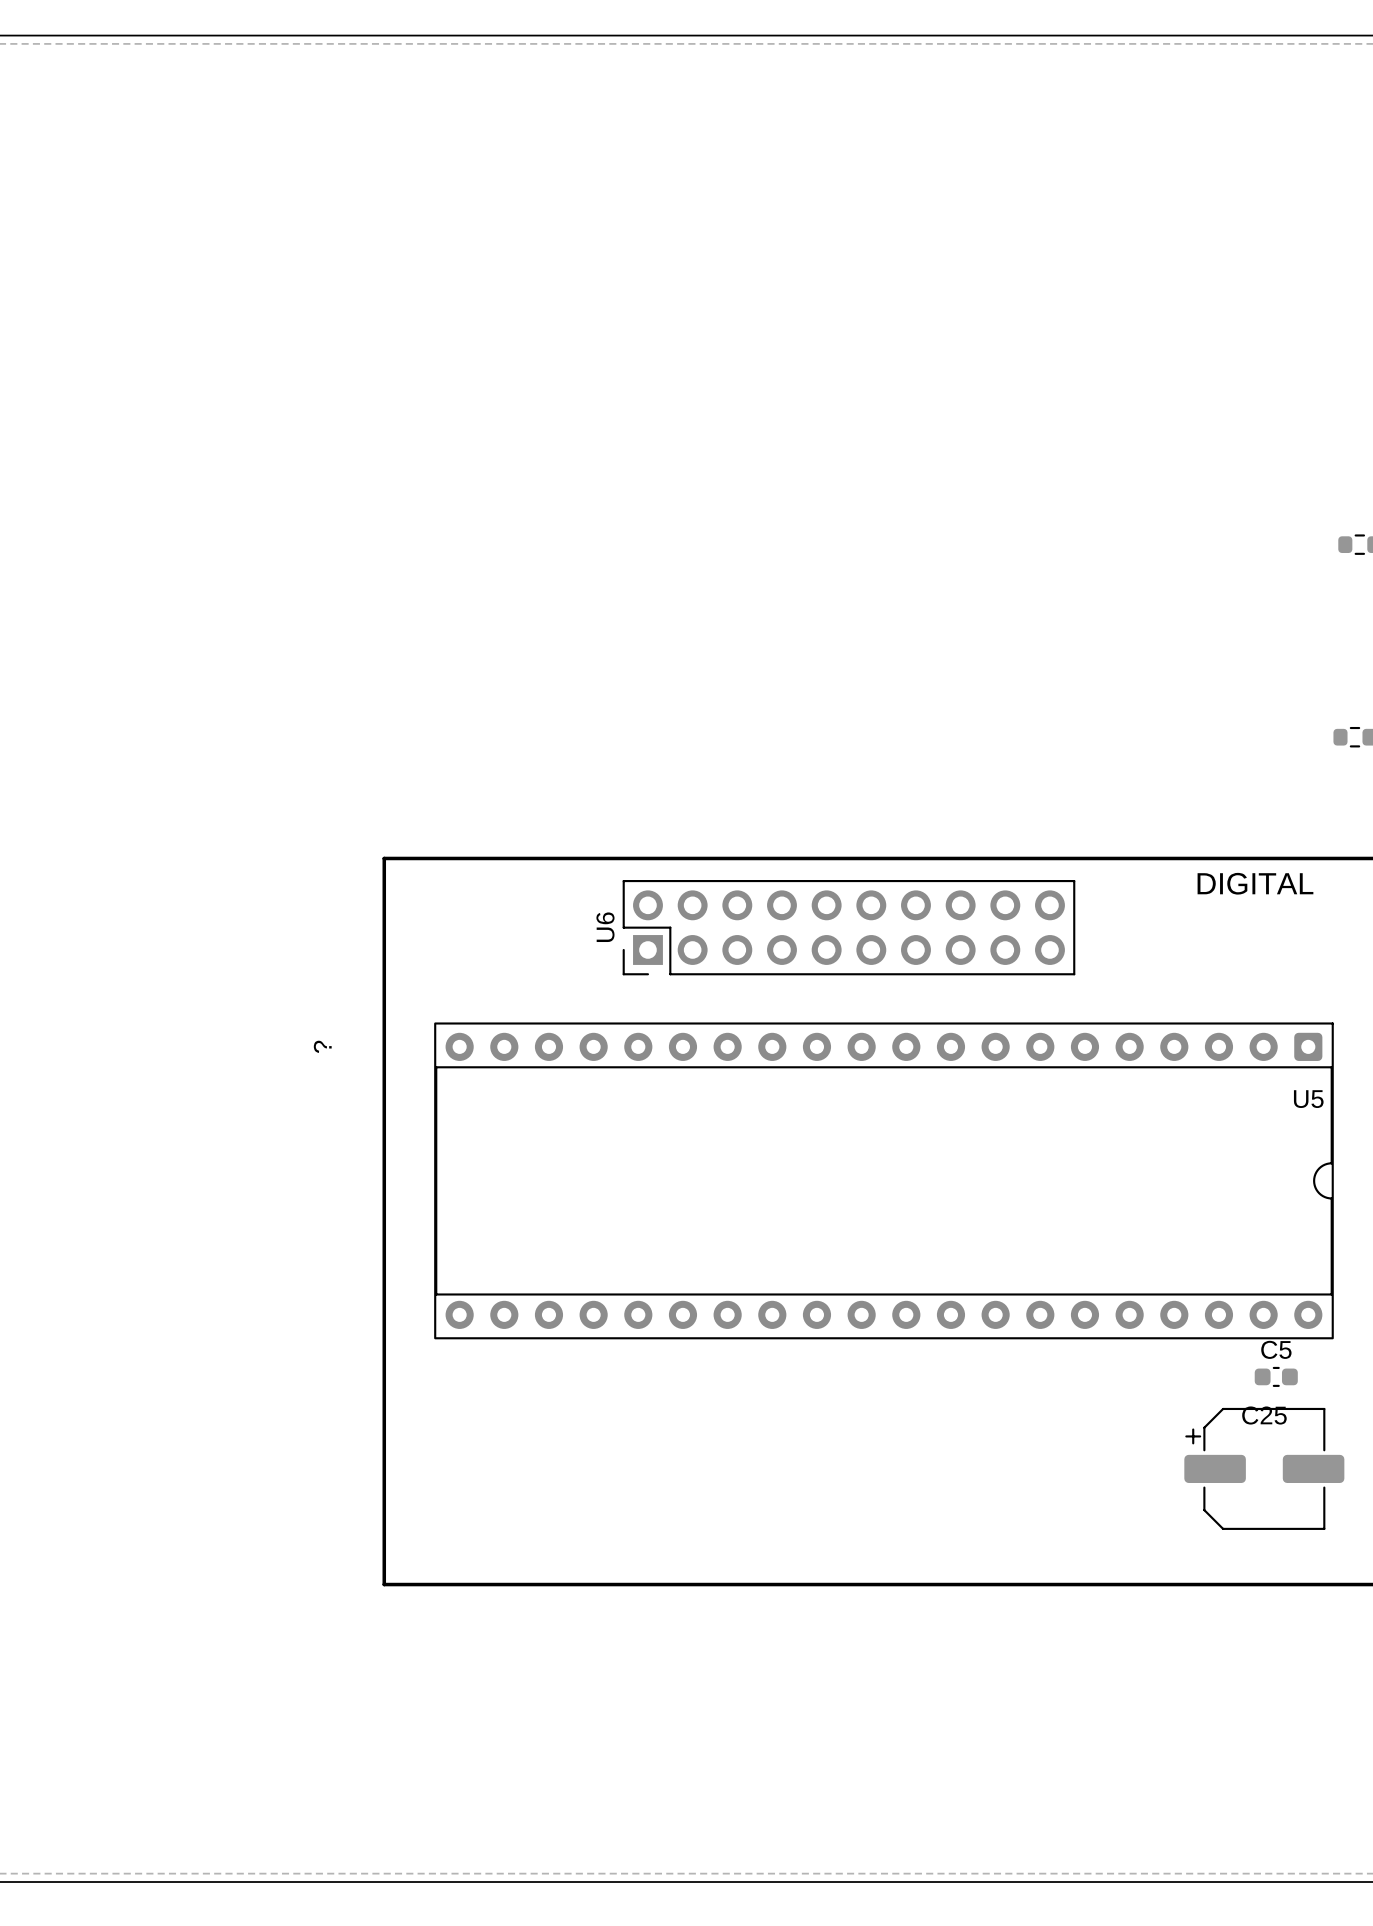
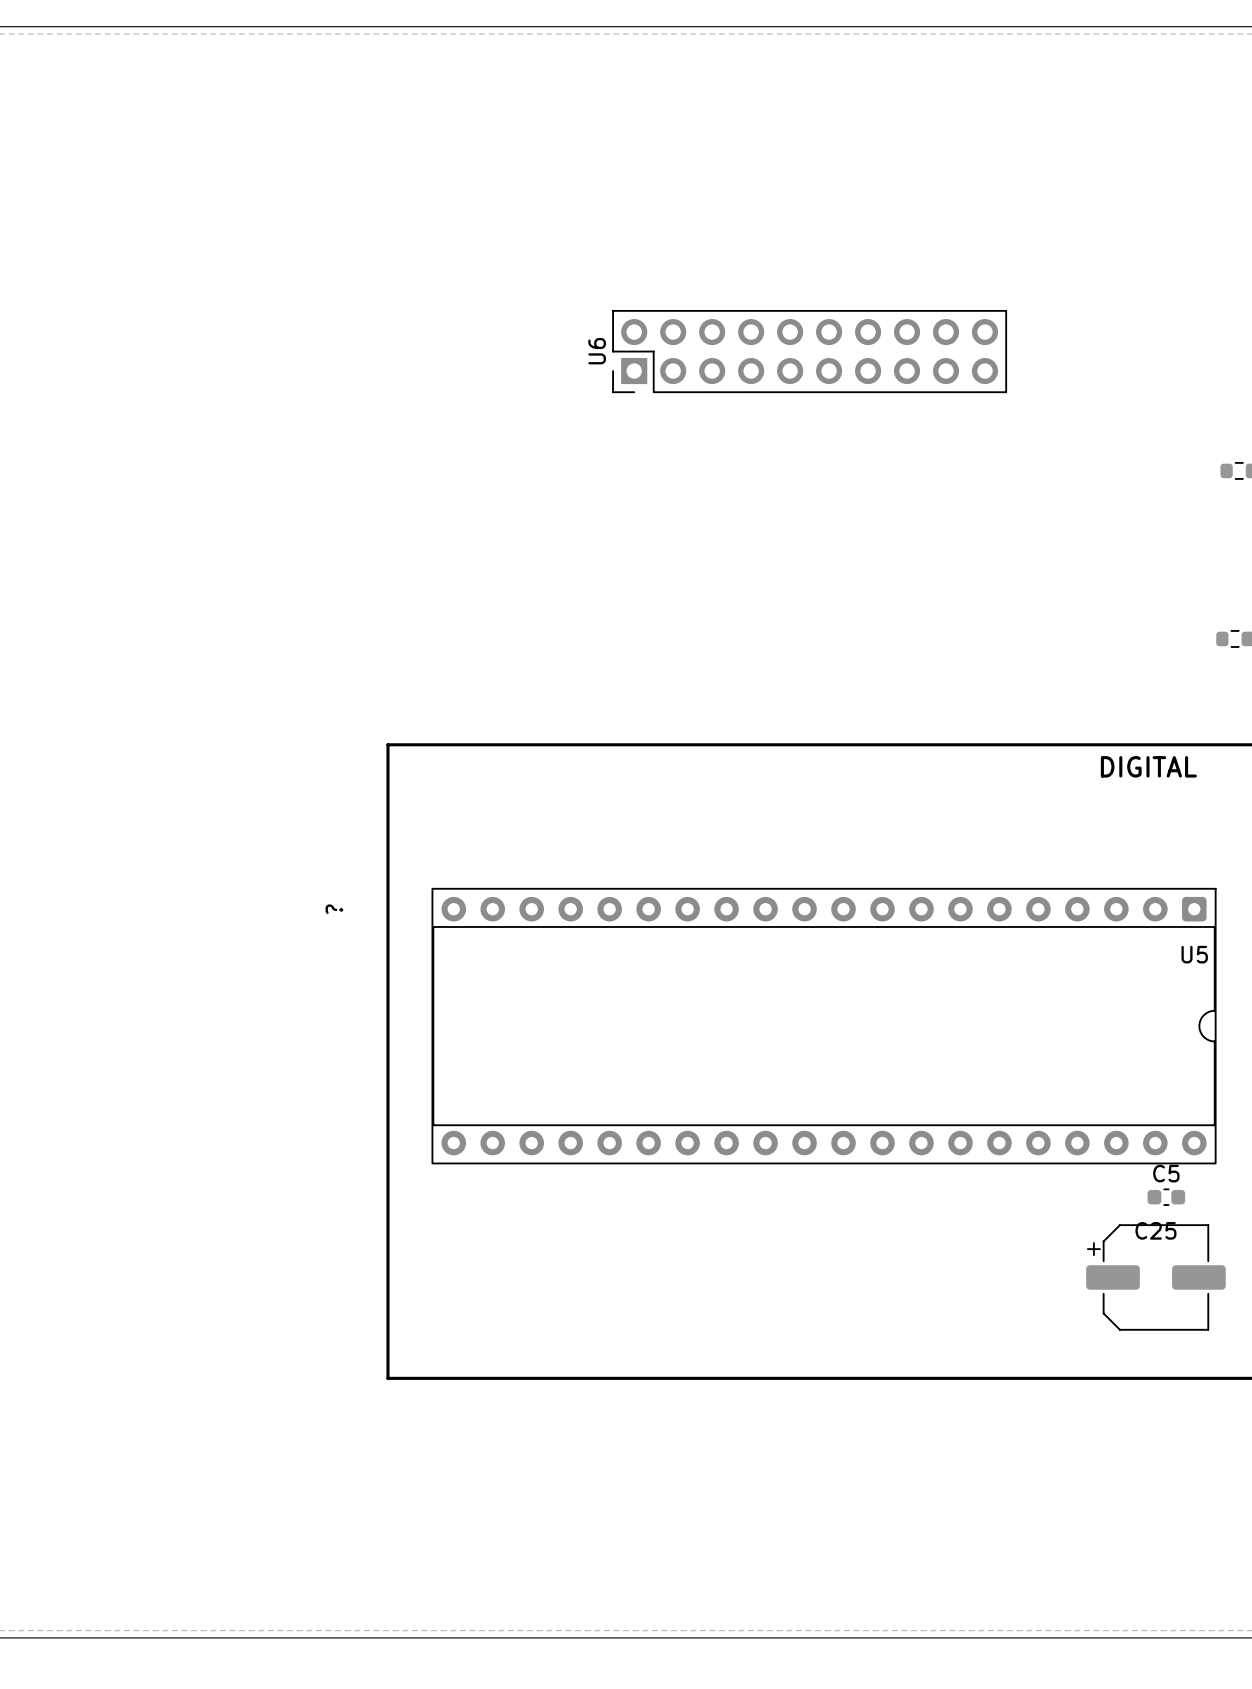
U6 position: (848, 927) -> (809, 351)

